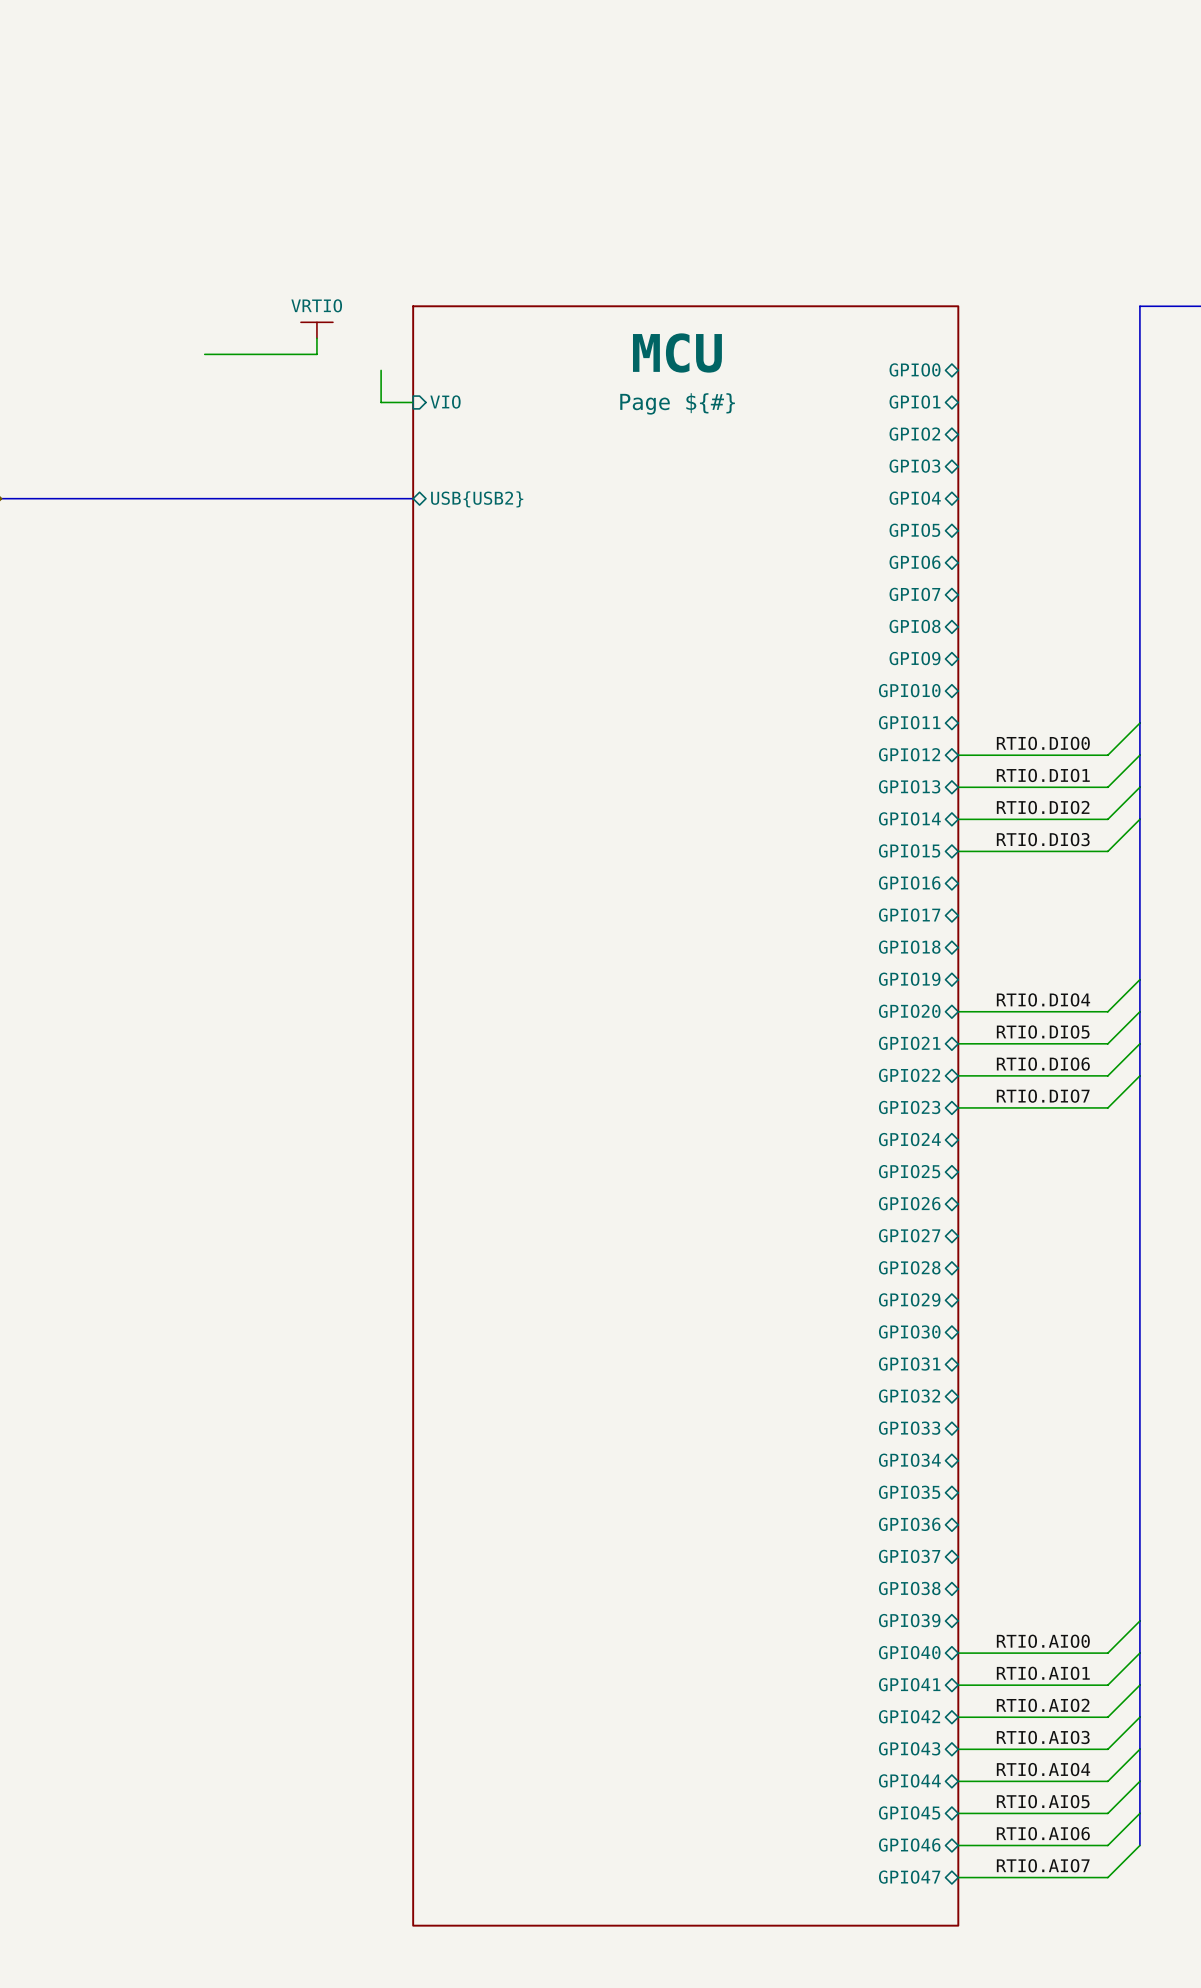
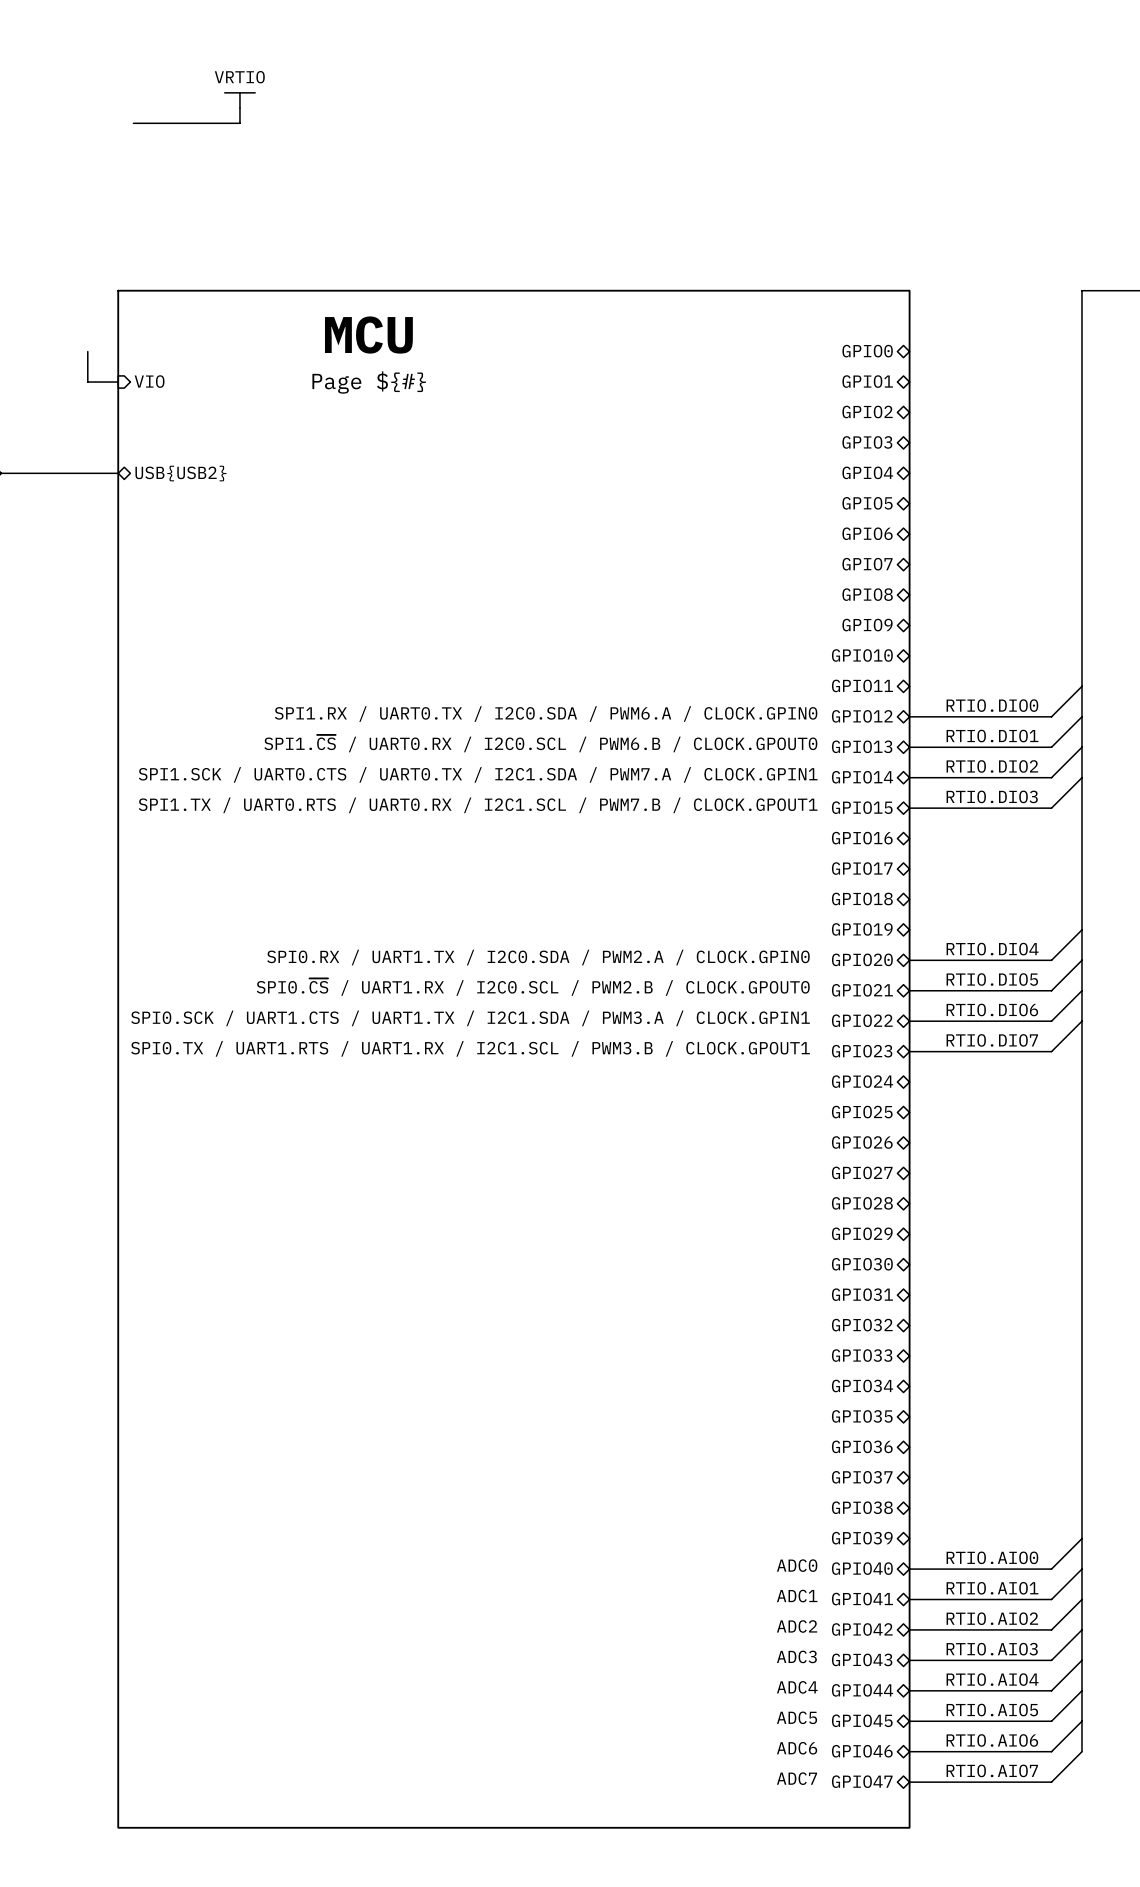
power symbol position: VRTIO (316, 330) -> VRTIO (239, 100)
wire: (316, 338) (316, 354) (204, 354) -> (239, 108) (239, 123) (133, 123)
wire: (381, 370) (381, 402) (413, 402) -> (87, 351) (87, 382) (118, 382)
sheet pin position: VIO (445, 402) -> VIO (149, 381)
bus: (124, 498) (413, 498) -> none
sheet pin position: USB{USB2} (477, 499) -> USB{USB2} (180, 473)
text: none -> SPI1.RX / UART0.TX / I2C0.SDA / PWM6.A / CLOCK.GPIN0 (546, 714)
text: none -> SPI1.~{CS} / UART0.RX / I2C0.SCL / PWM6.B / CLOCK.GPOUT0 (540, 743)
text: none -> SPI1.SCK / UART0.CTS / UART0.TX / I2C1.SDA / PWM7.A / CLOCK.GPIN1 (478, 774)
text: none -> SPI1.TX / UART0.RTS / UART0.RX / I2C1.SCL / PWM7.B / CLOCK.GPOUT1 (478, 805)
text: none -> SPI0.RX / UART1.TX / I2C0.SDA / PWM2.A / CLOCK.GPIN0 (538, 957)
text: none -> SPI0.~{CS} / UART1.RX / I2C0.SCL / PWM2.B / CLOCK.GPOUT0 (533, 987)
text: none -> SPI0.SCK / UART1.CTS / UART1.TX / I2C1.SDA / PWM3.A / CLOCK.GPIN1 (470, 1018)
text: none -> SPI0.TX / UART1.RTS / UART1.RX / I2C1.SCL / PWM3.B / CLOCK.GPOUT1 (470, 1048)
sheet MCU: none -> (513, 1059)
sheet MCU: (685, 1115) -> none
text: none -> ADC0 (797, 1565)
text: none -> ADC1 (797, 1596)
text: none -> ADC2 (797, 1626)
text: none -> ADC3 (796, 1656)
text: none -> ADC4 (797, 1687)
text: none -> ADC5 (797, 1717)
text: none -> ADC6 (797, 1748)
text: none -> ADC7 (797, 1778)

